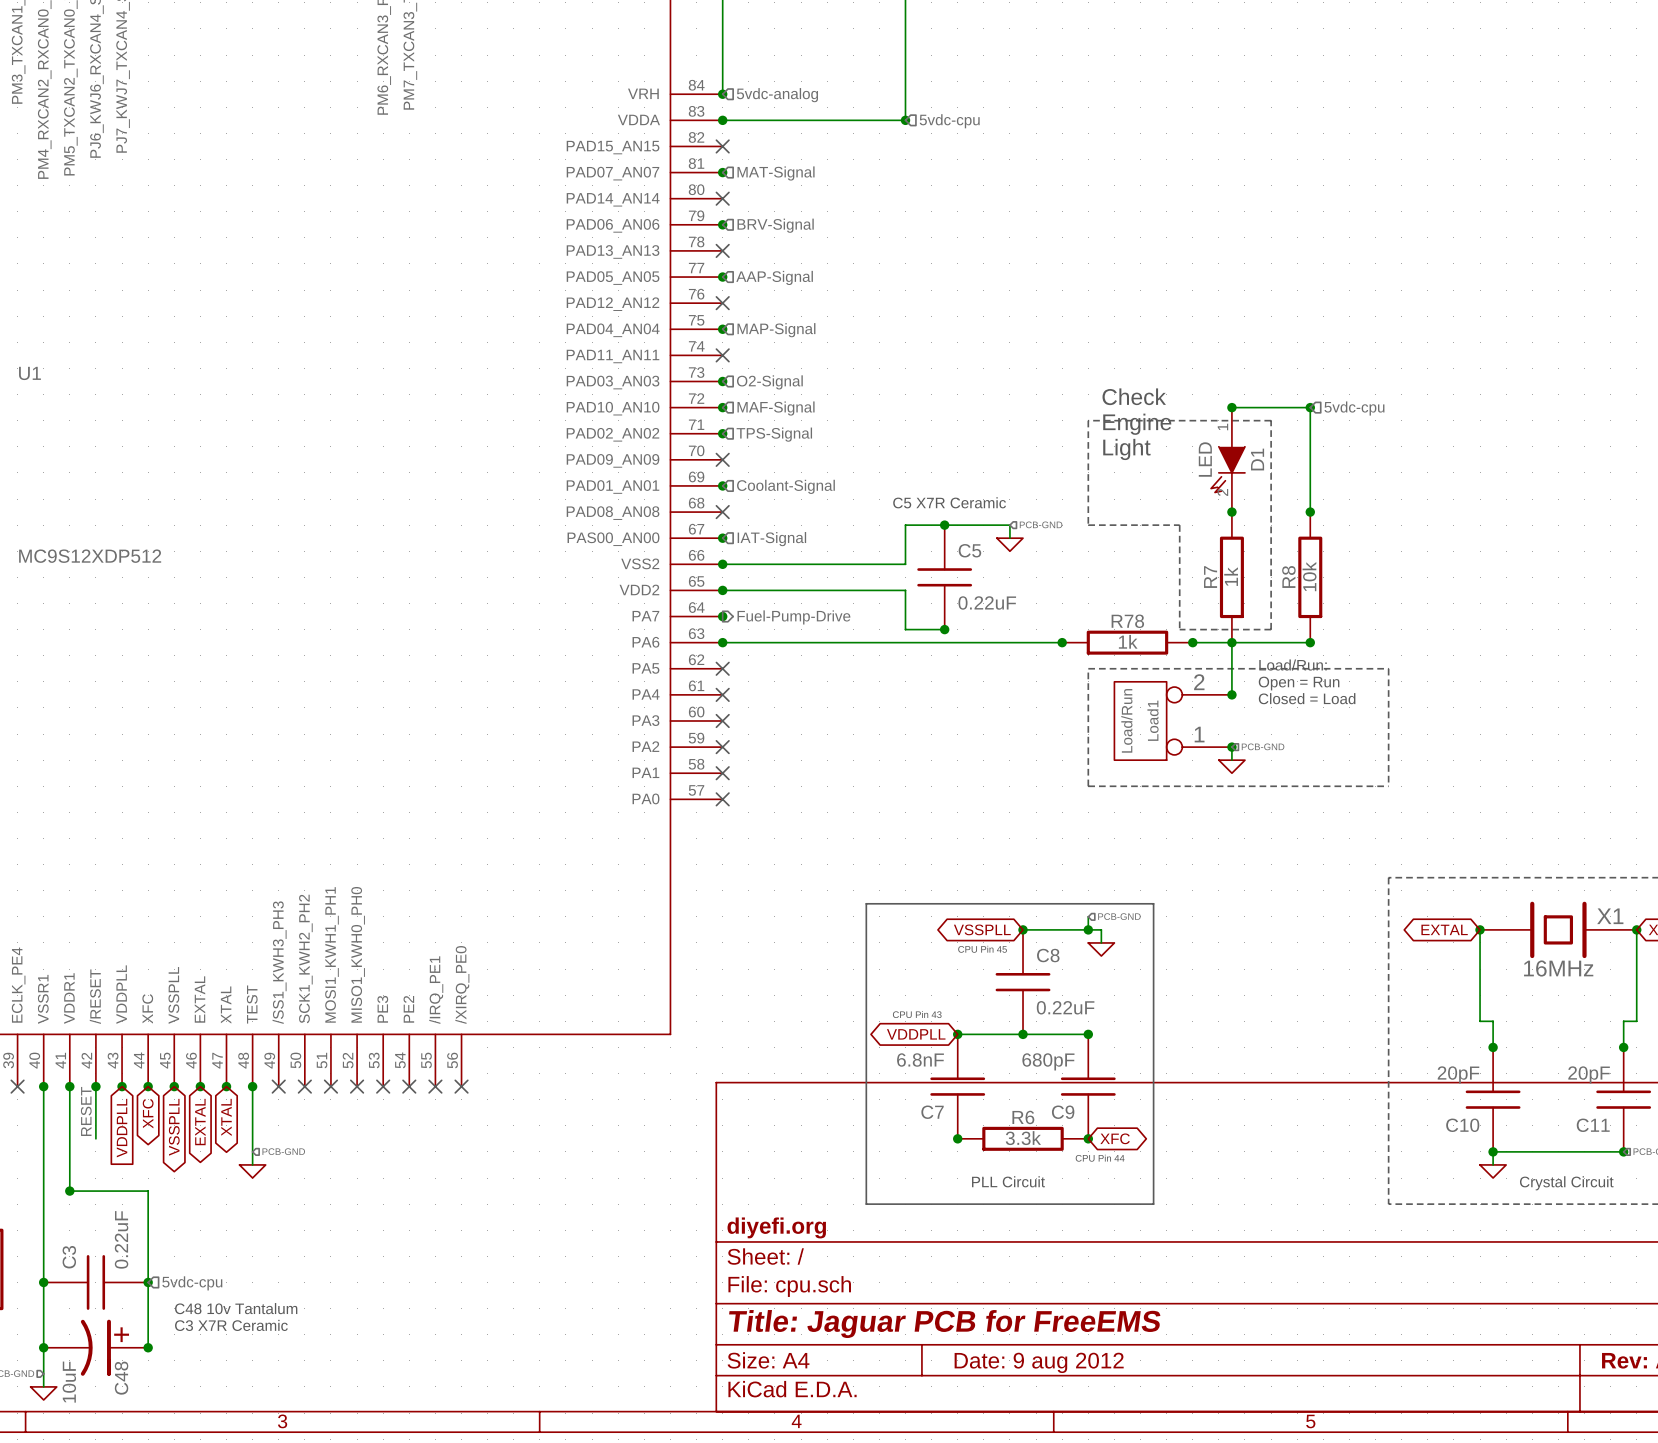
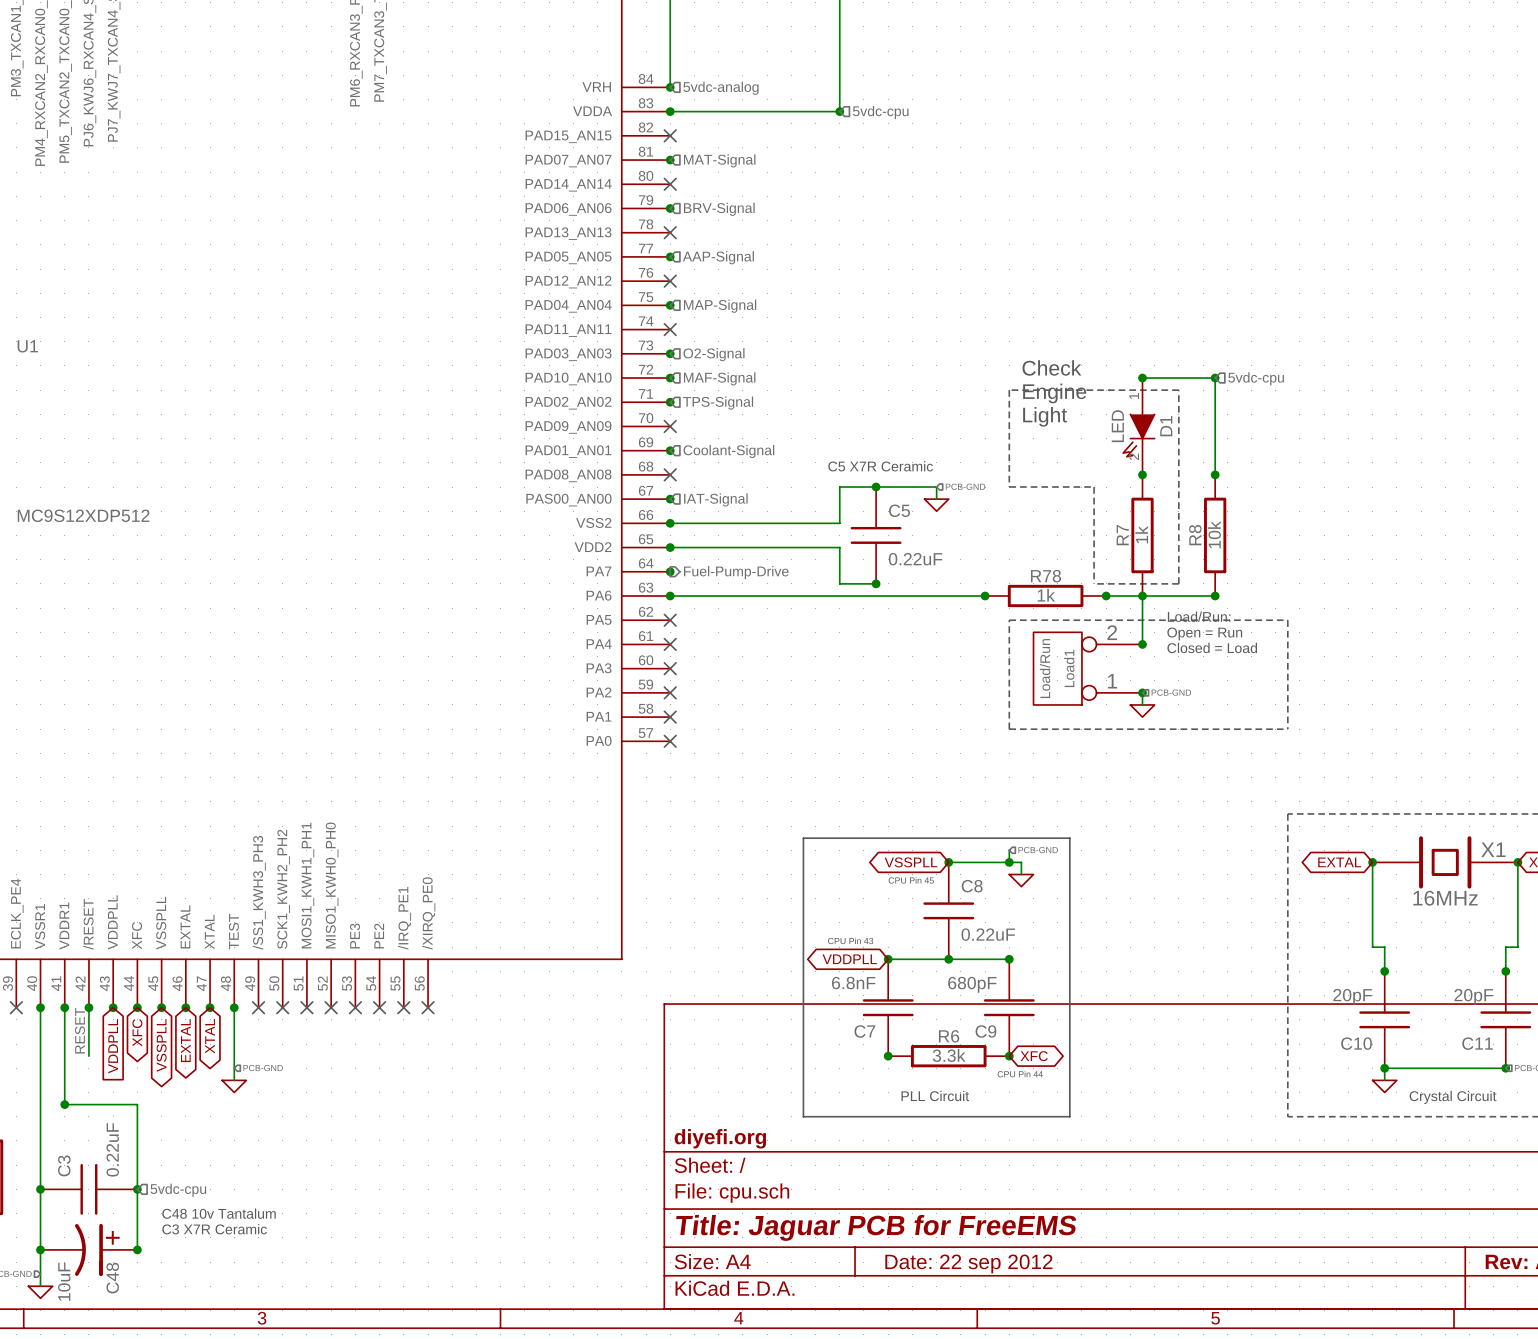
title block: Date: 9 aug 2012 (1039, 1362) -> Date: 22 sep 2012 (968, 1263)

